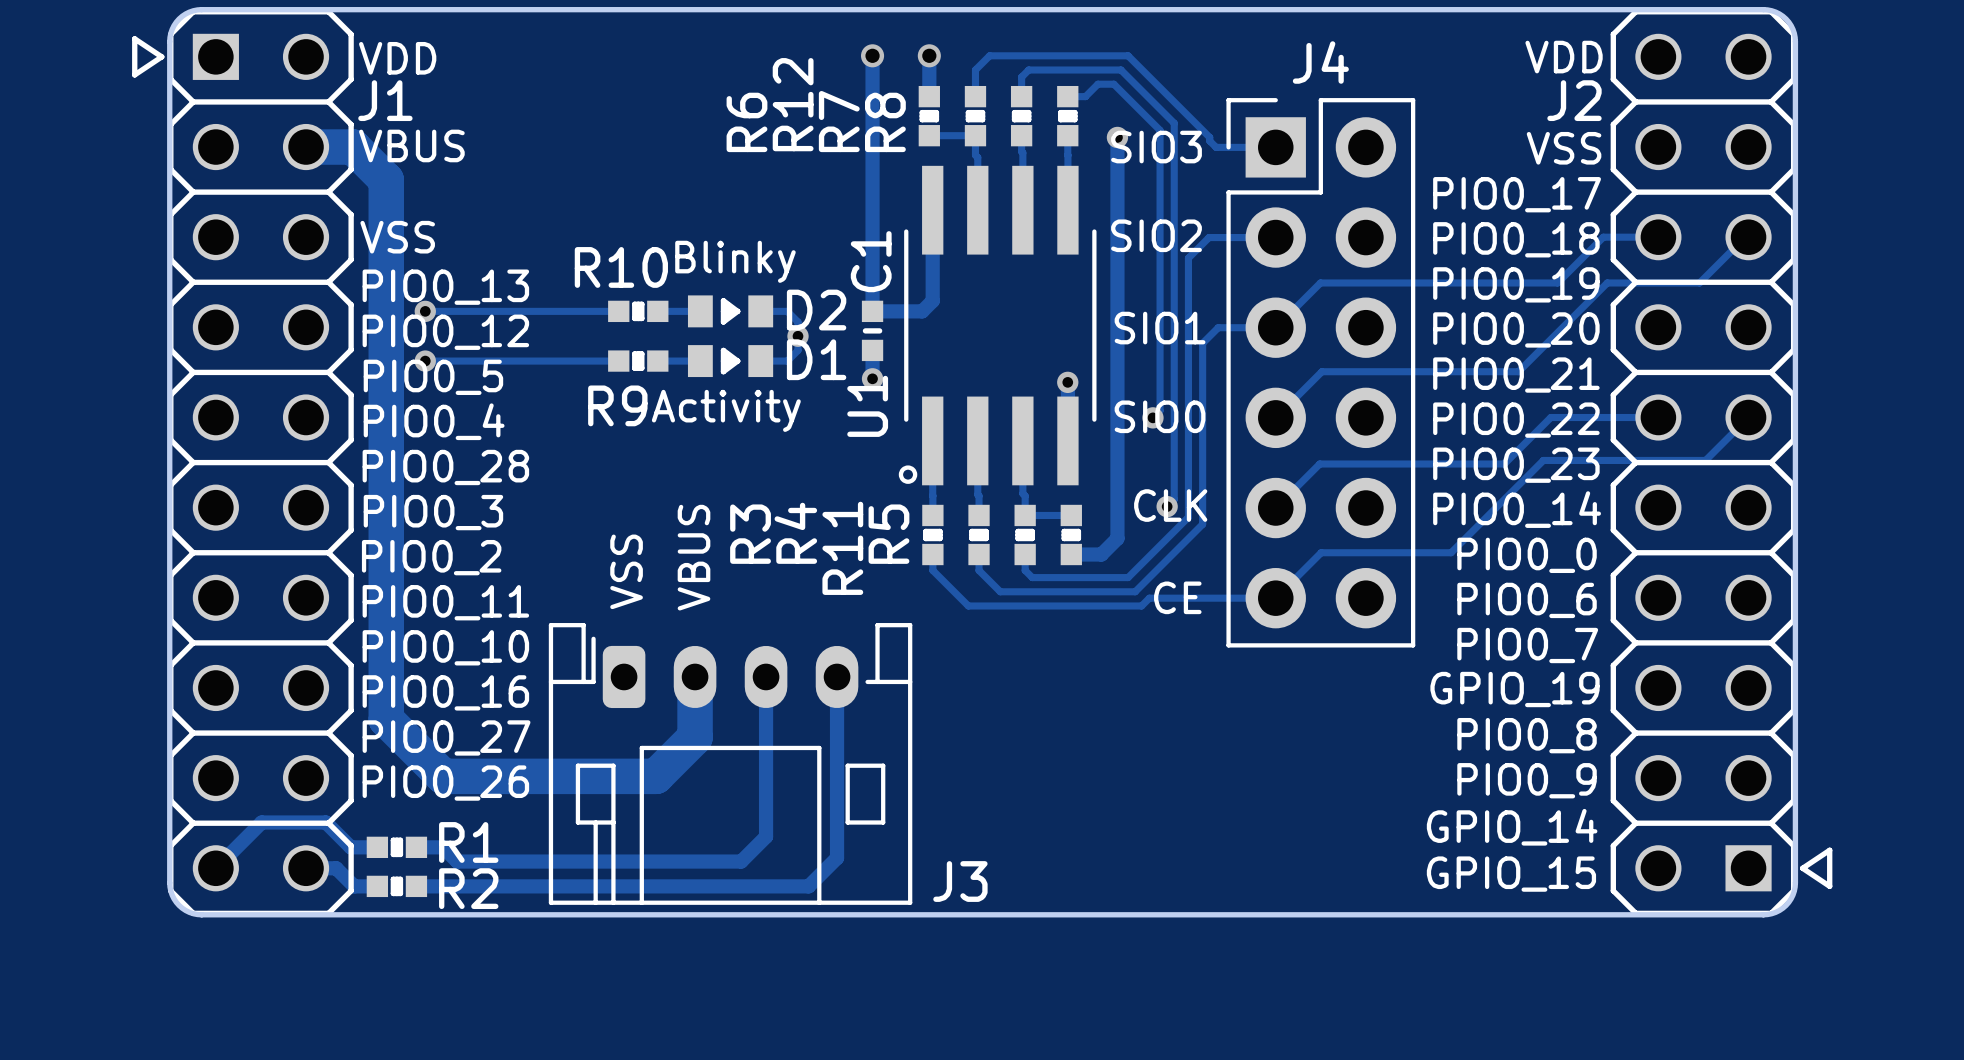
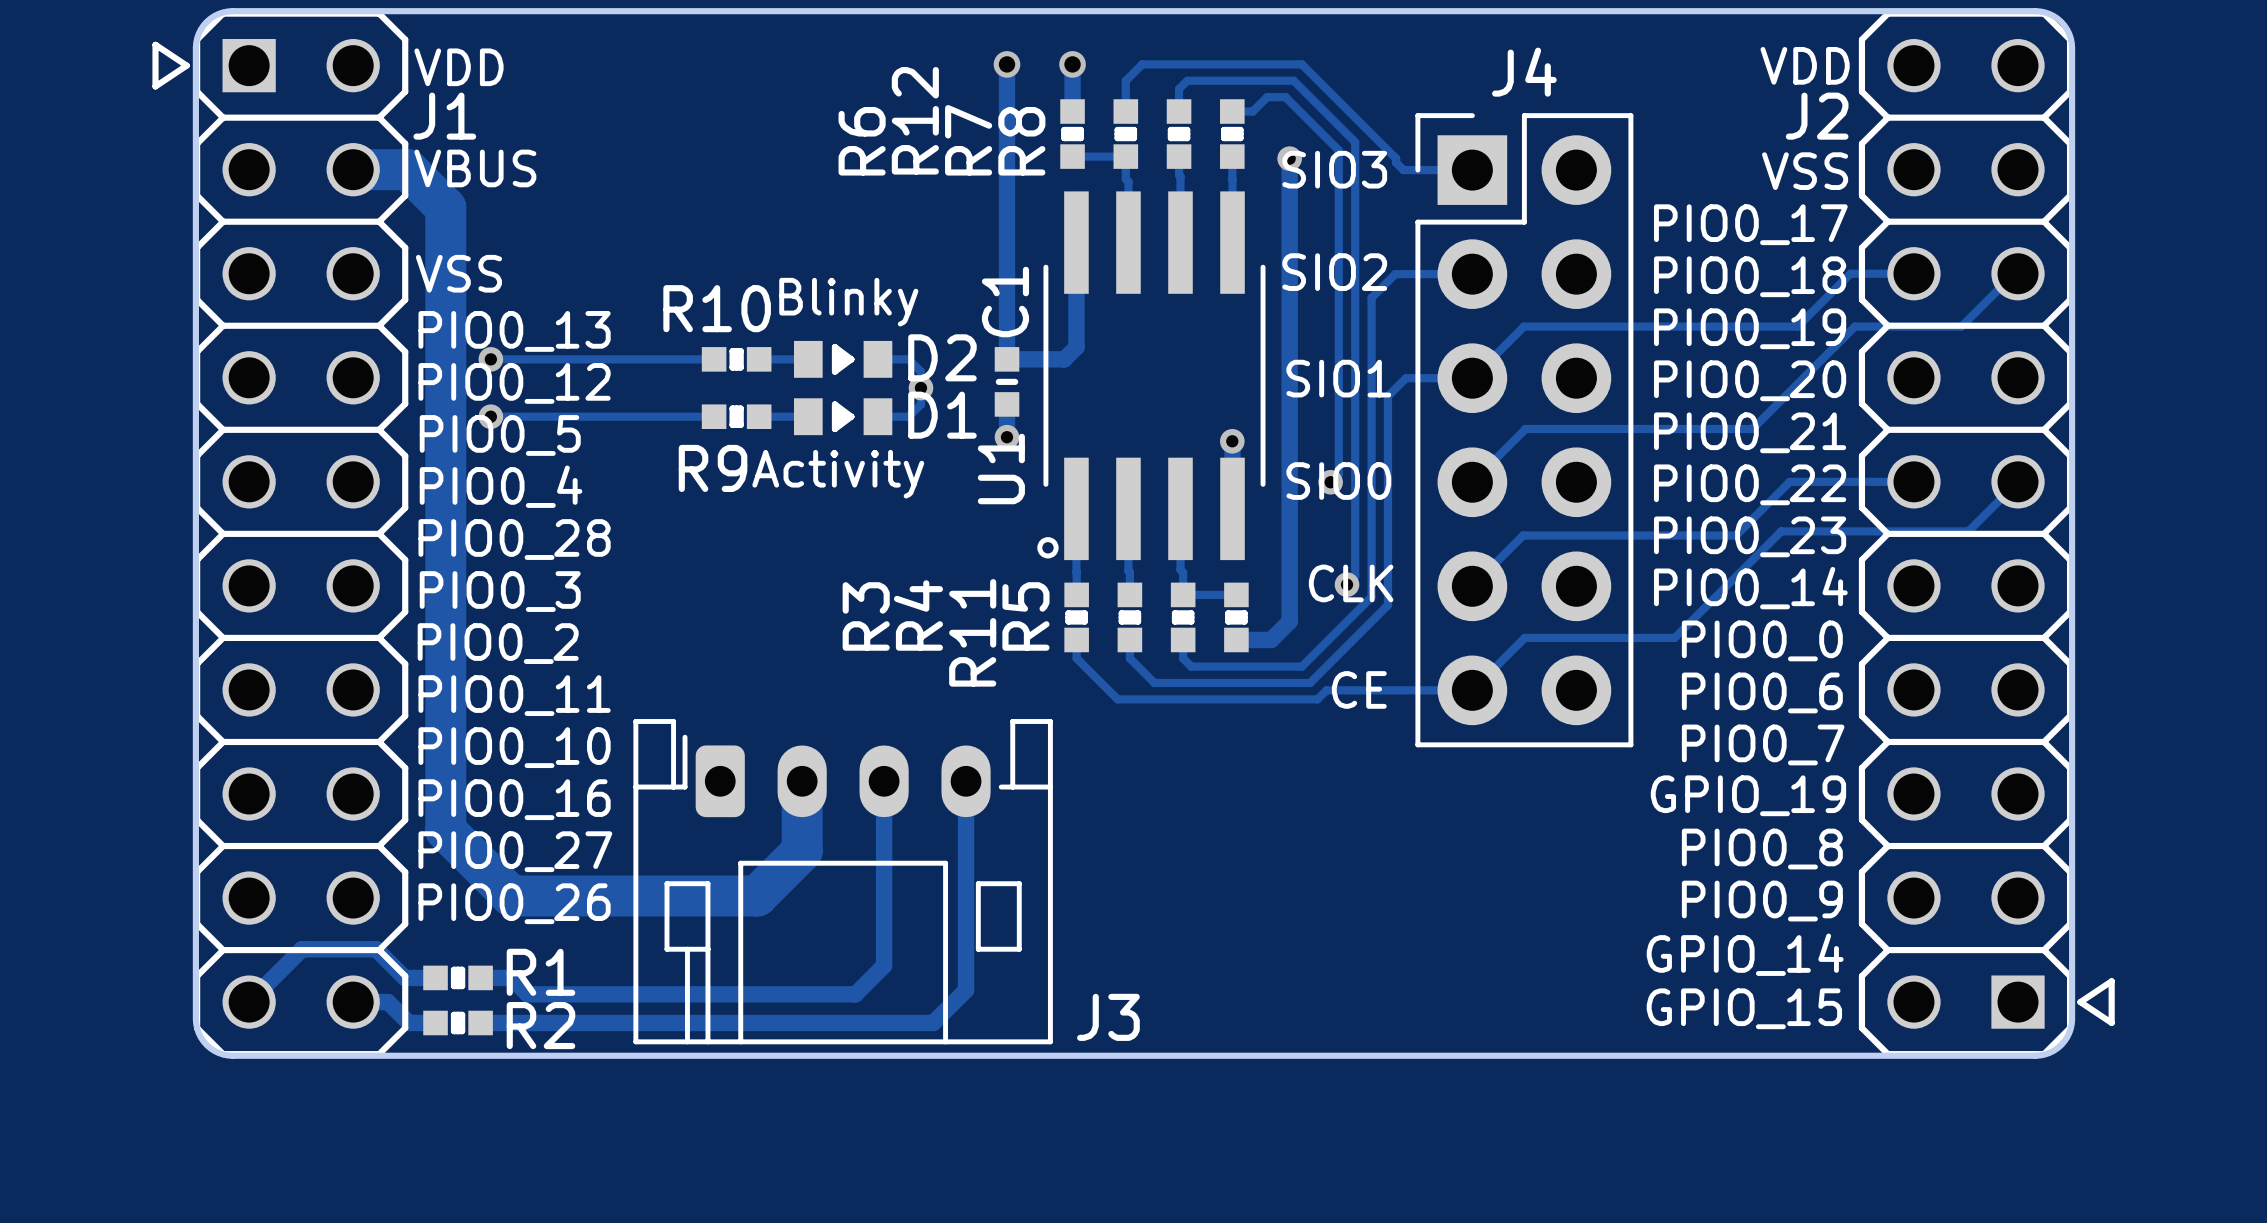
text: VBUS (694, 557) -> none
text: VSS (626, 571) -> none

